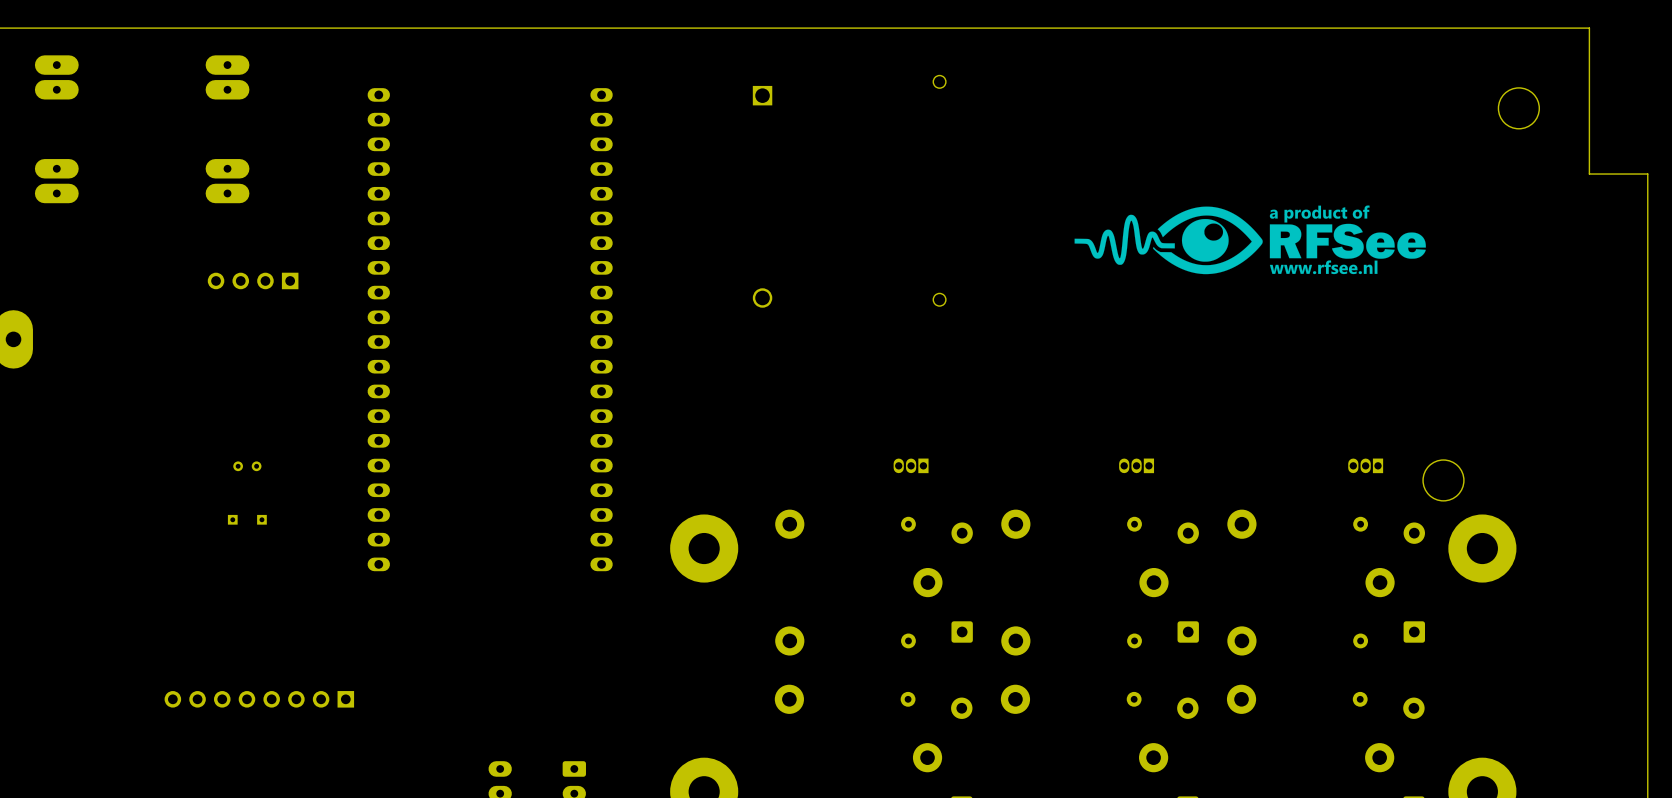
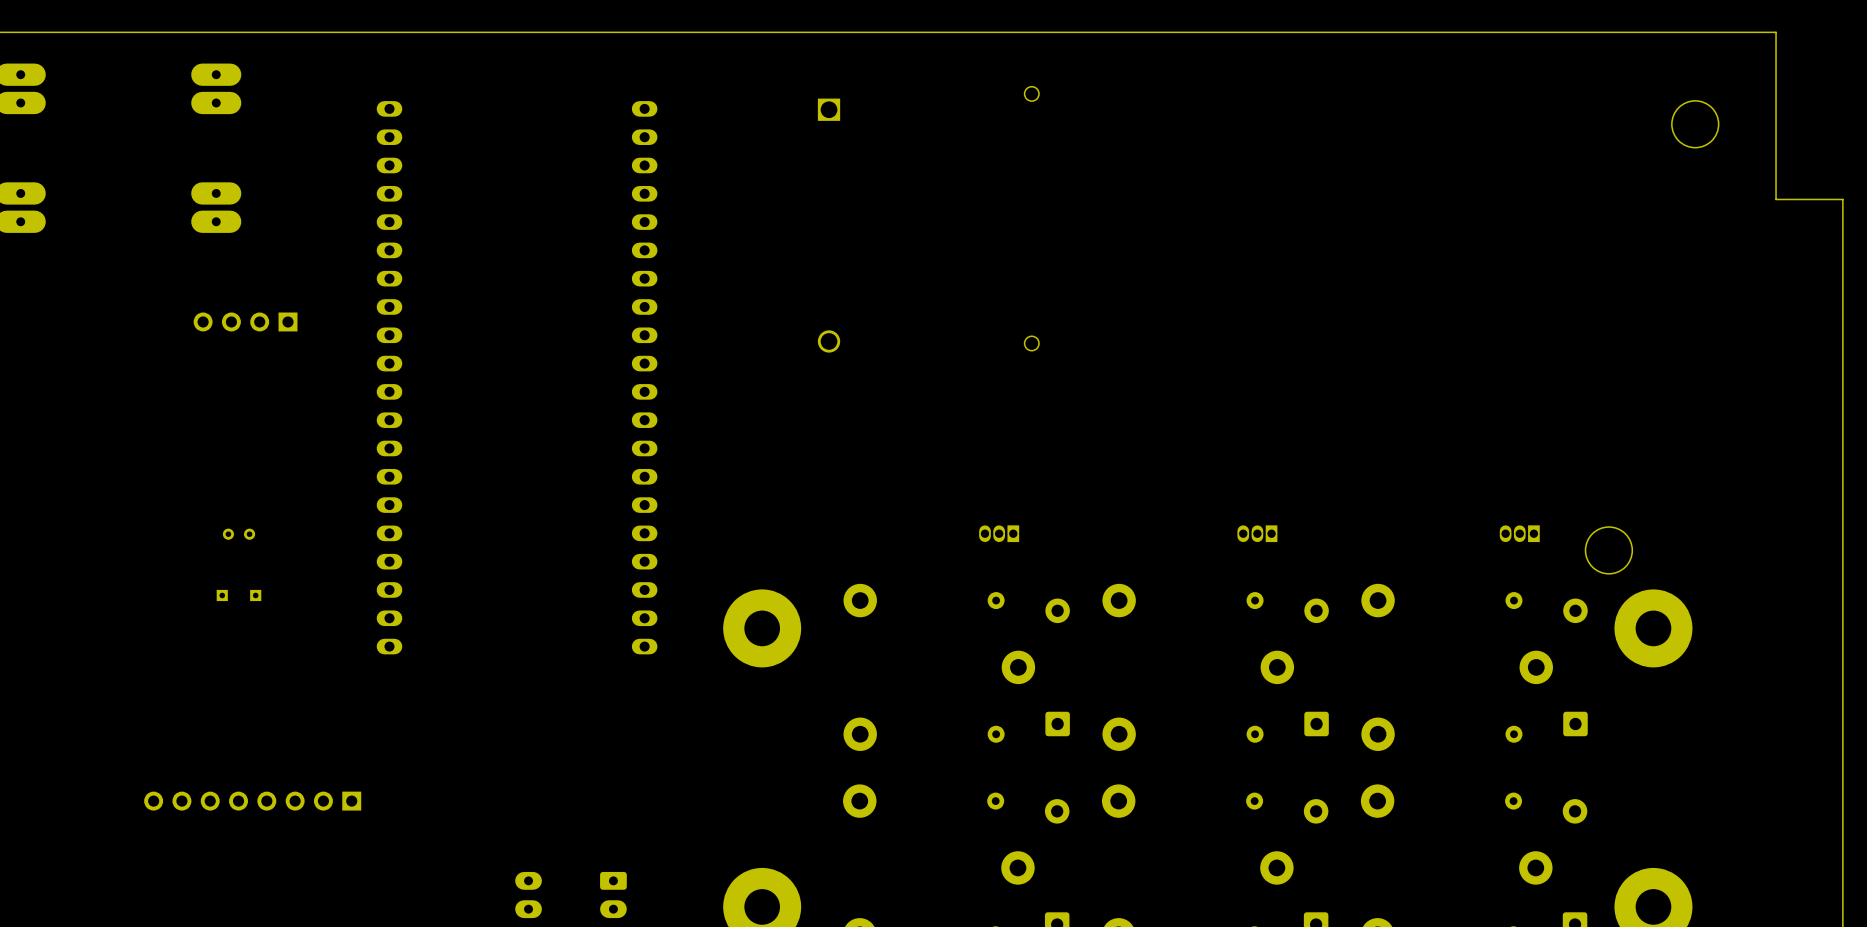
drawing: [1074, 205, 1426, 275] -> none

